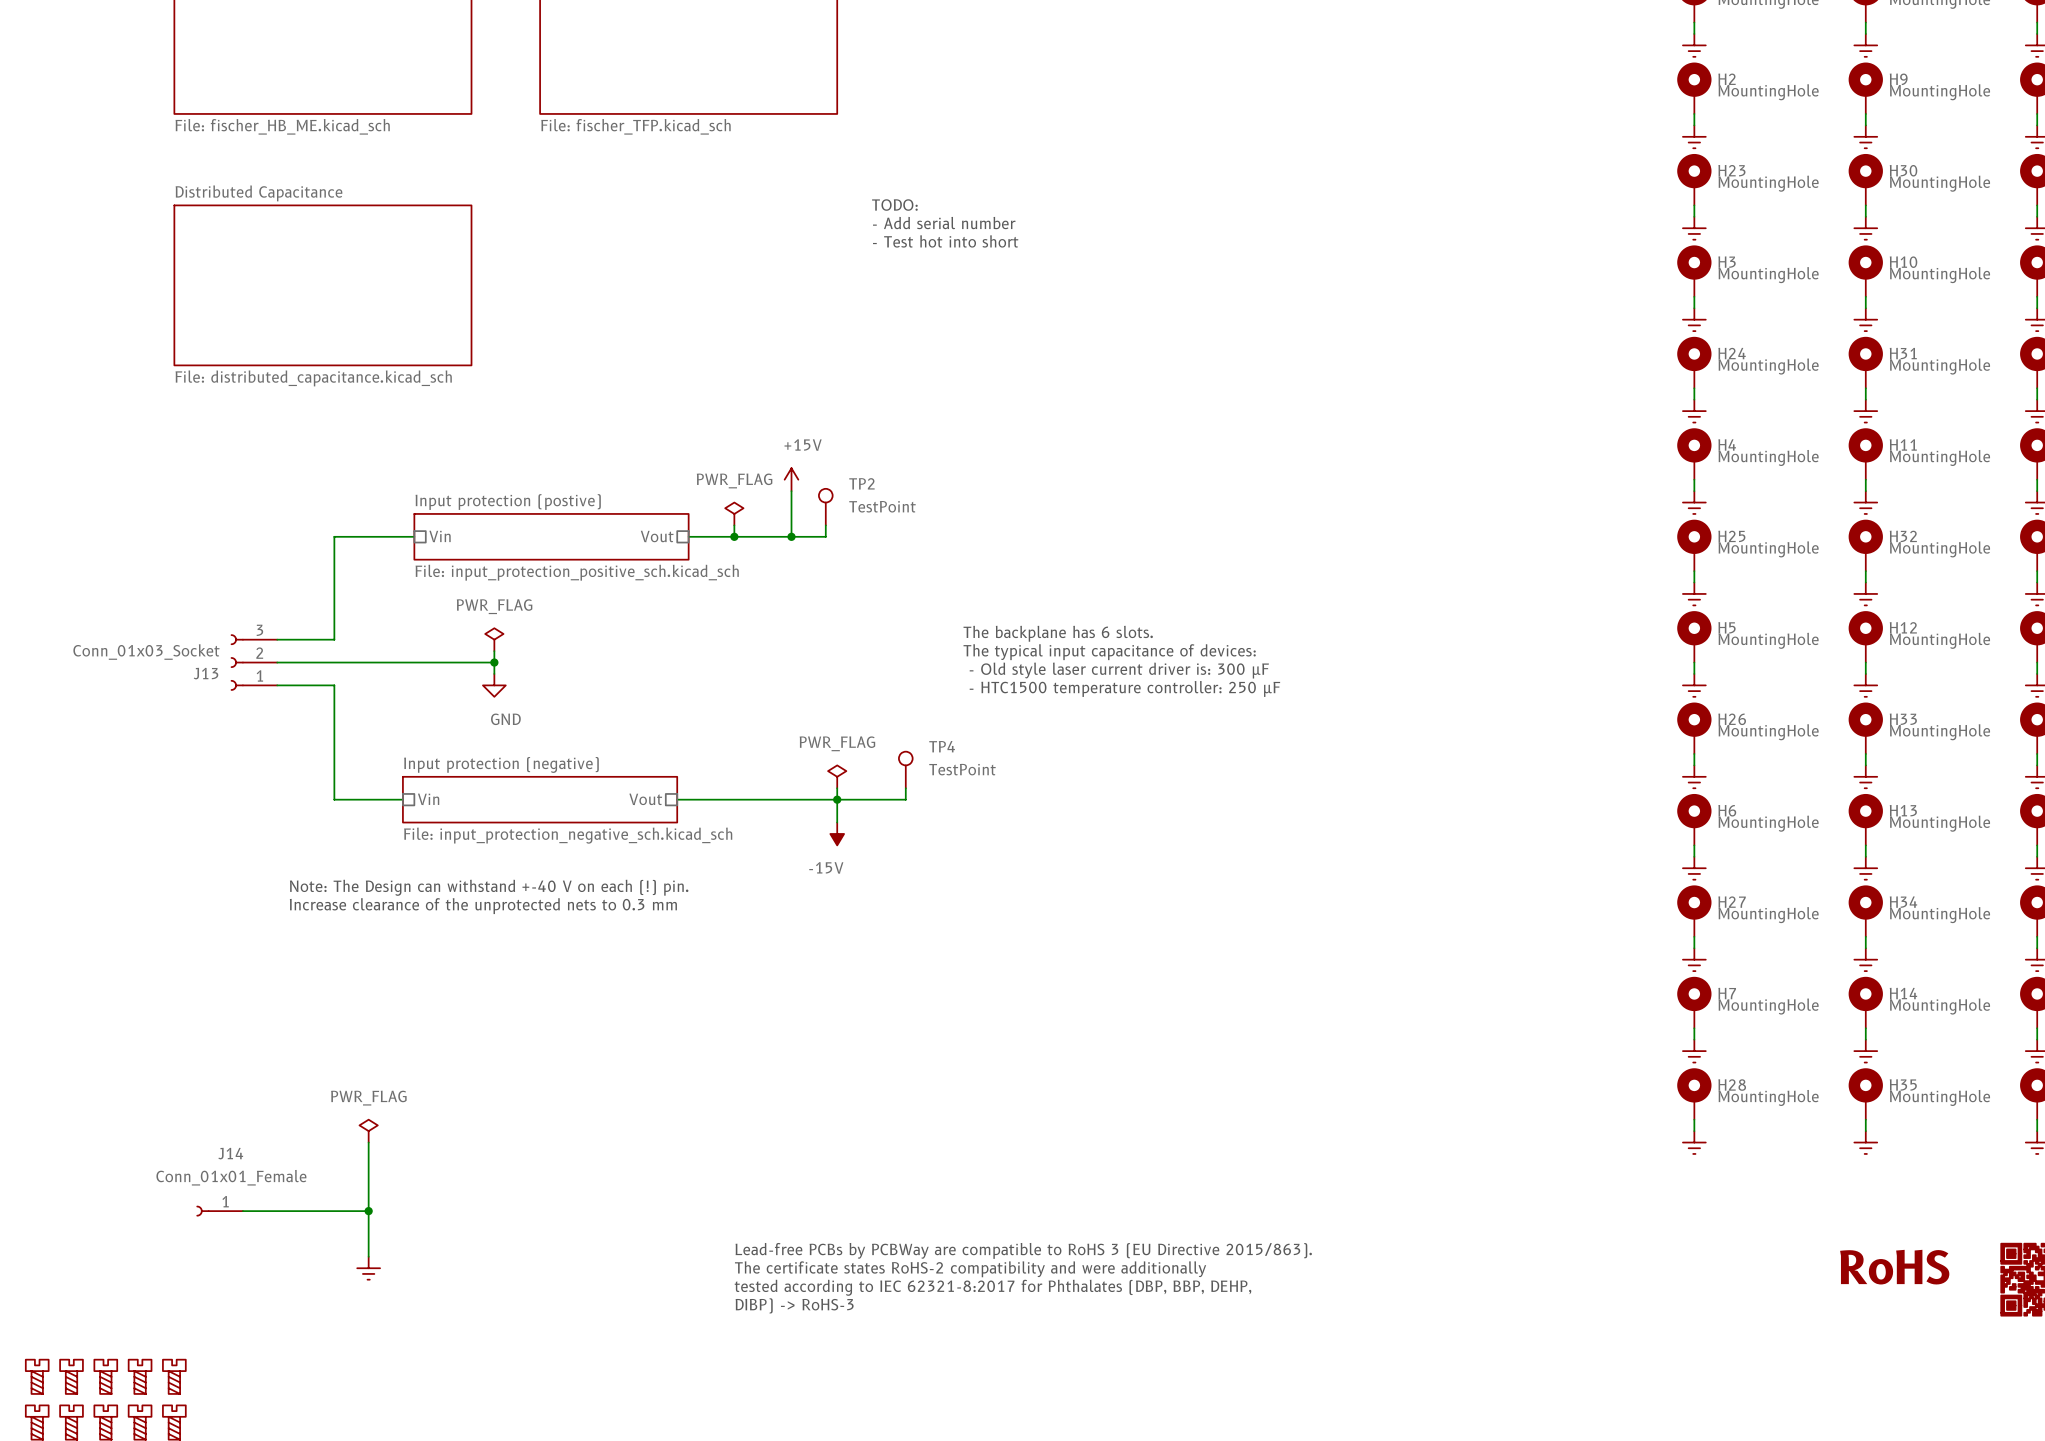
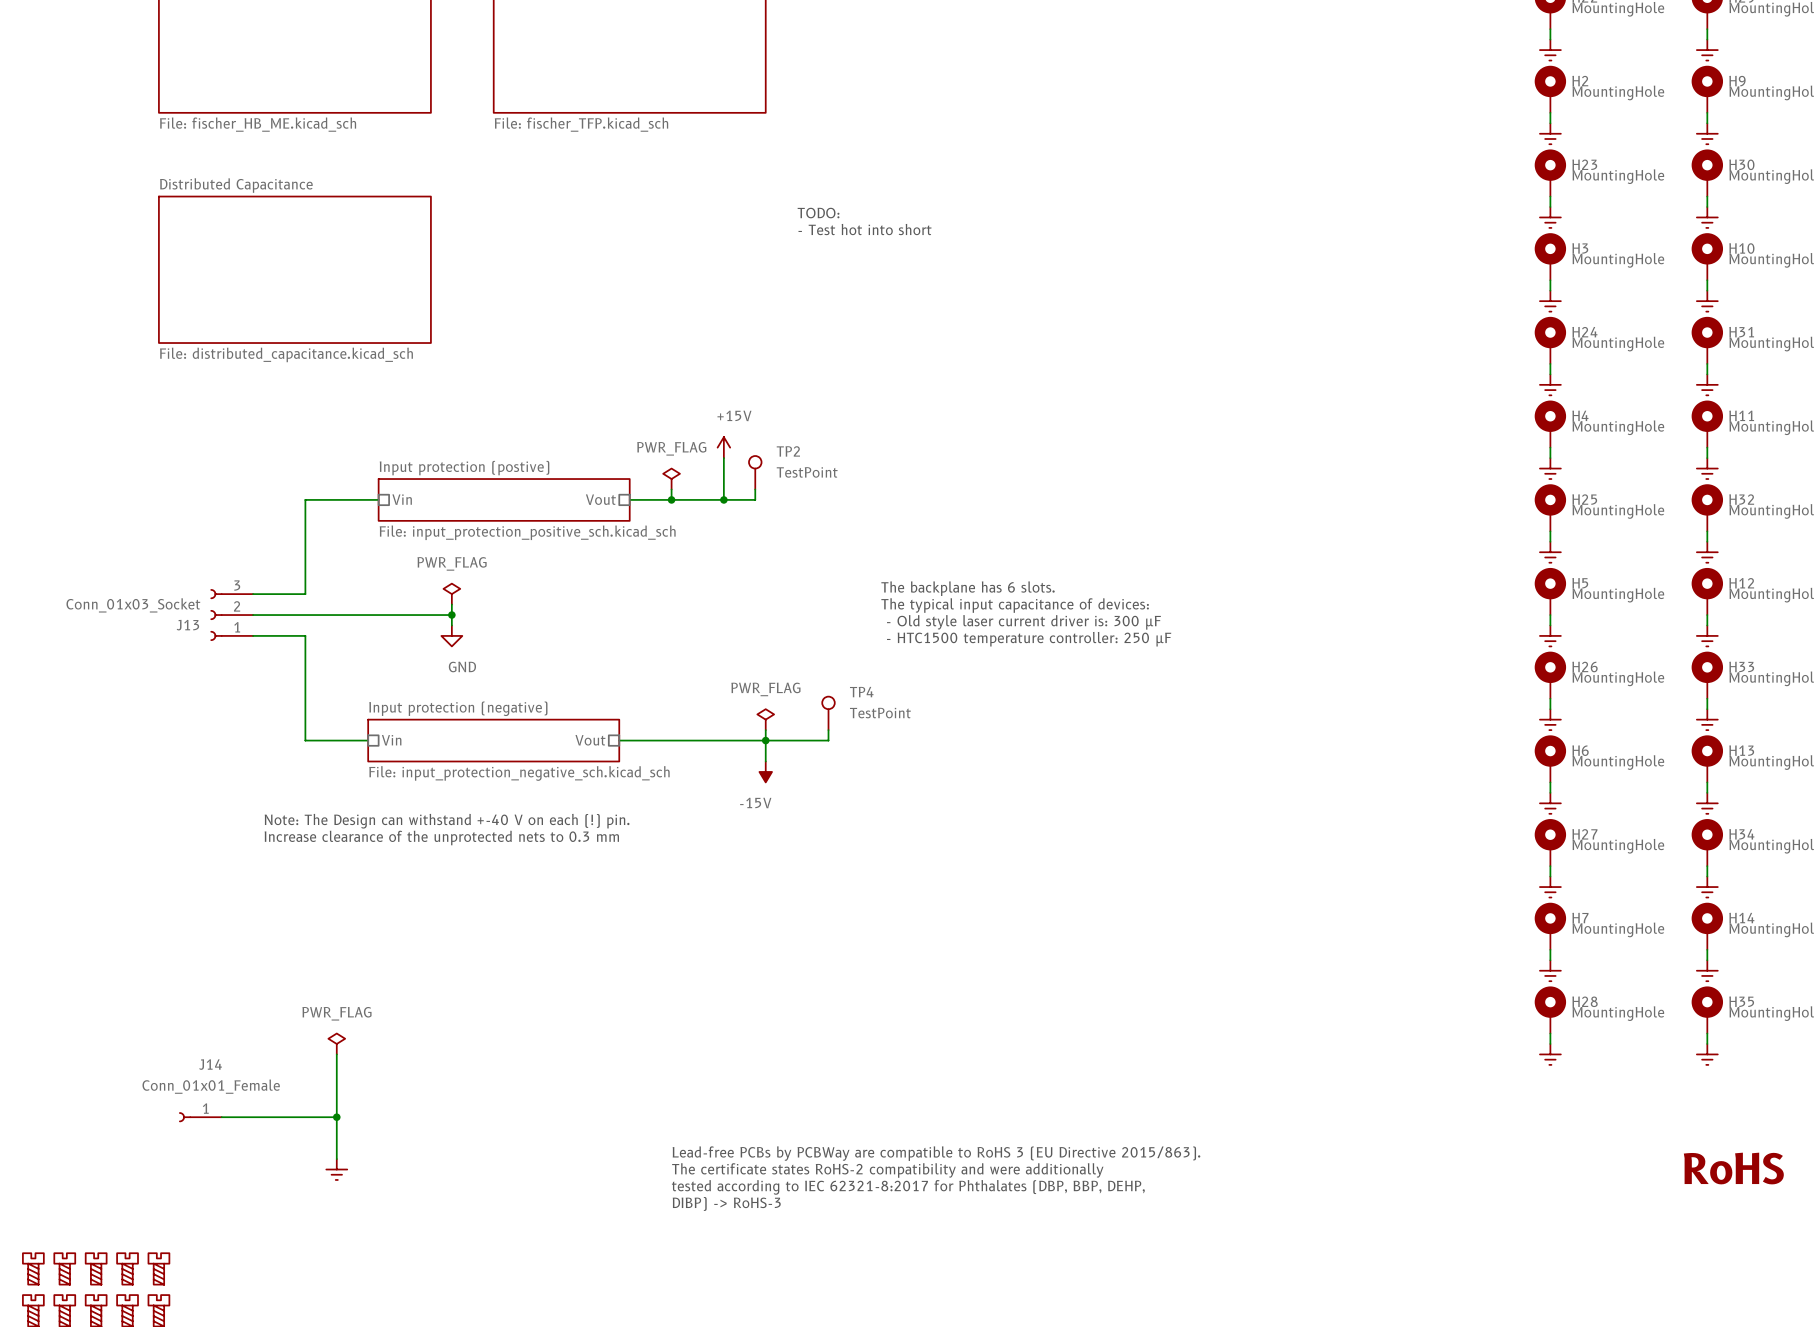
text: TODO: (894, 205) -> none
text: - Add serial number (944, 223) -> TODO: (818, 213)

